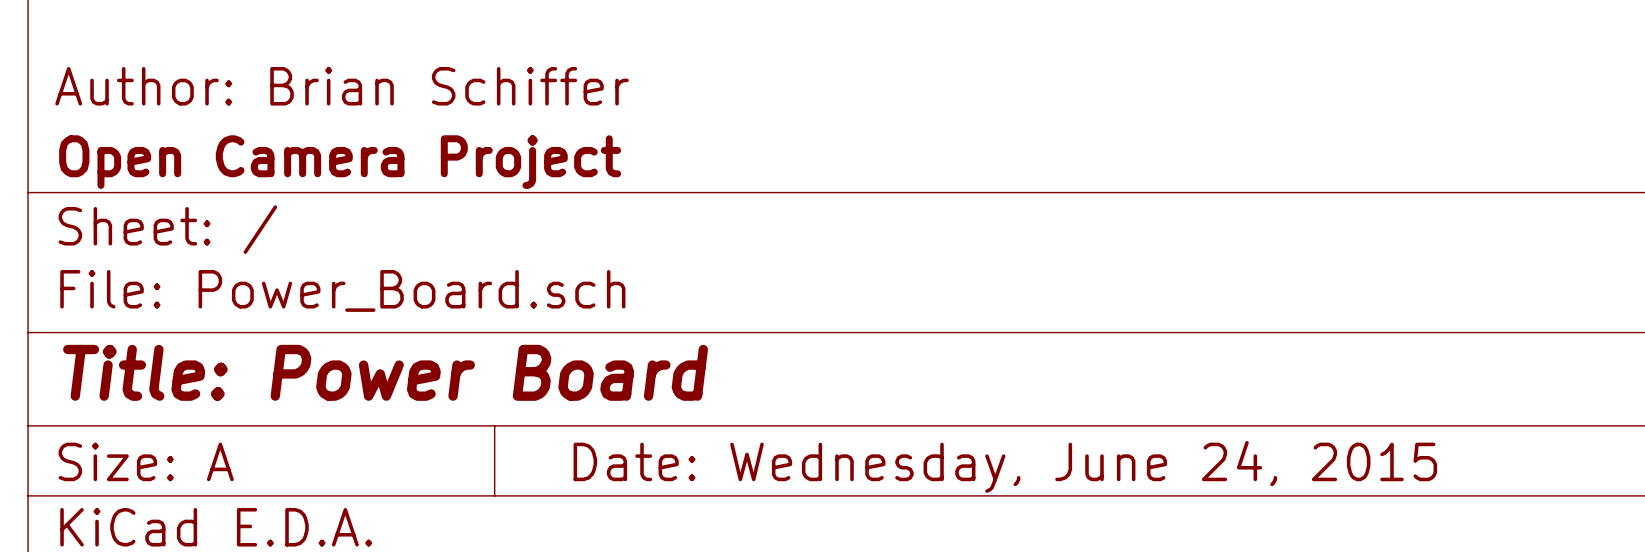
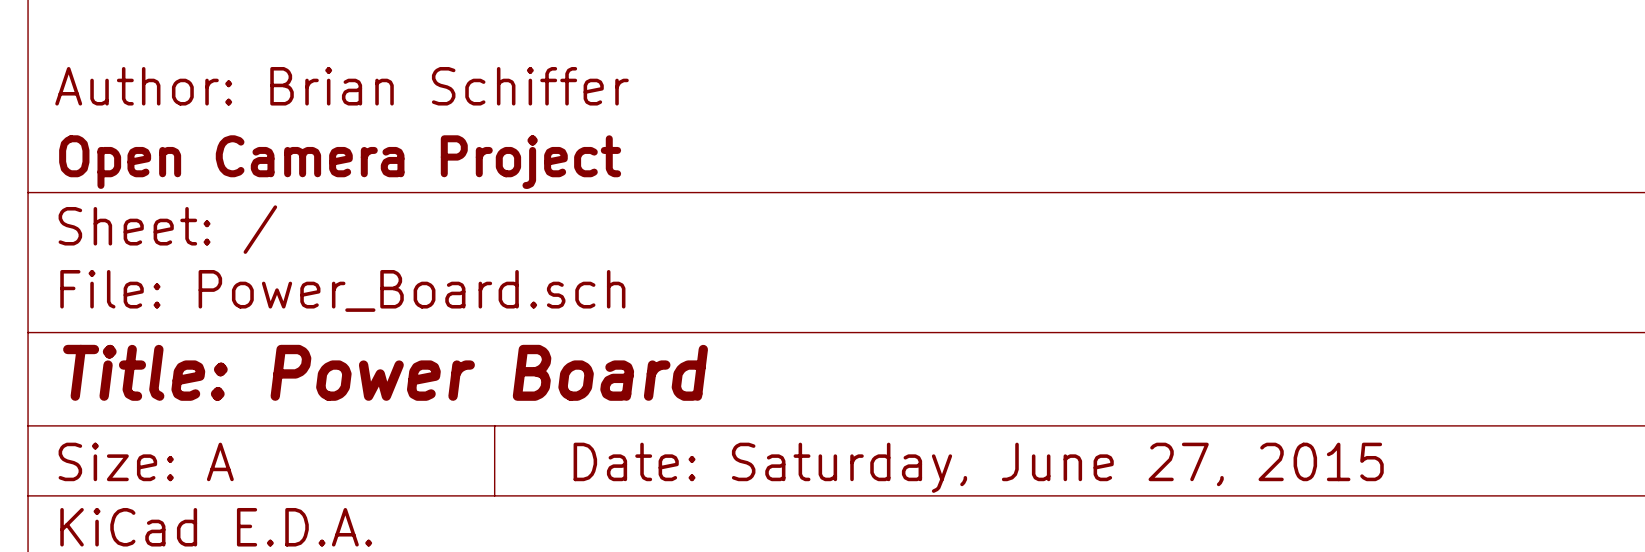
title block: Date: Wednesday, June 24, 2015 (1005, 466) -> Date: Saturday, June 27, 2015 (978, 467)

